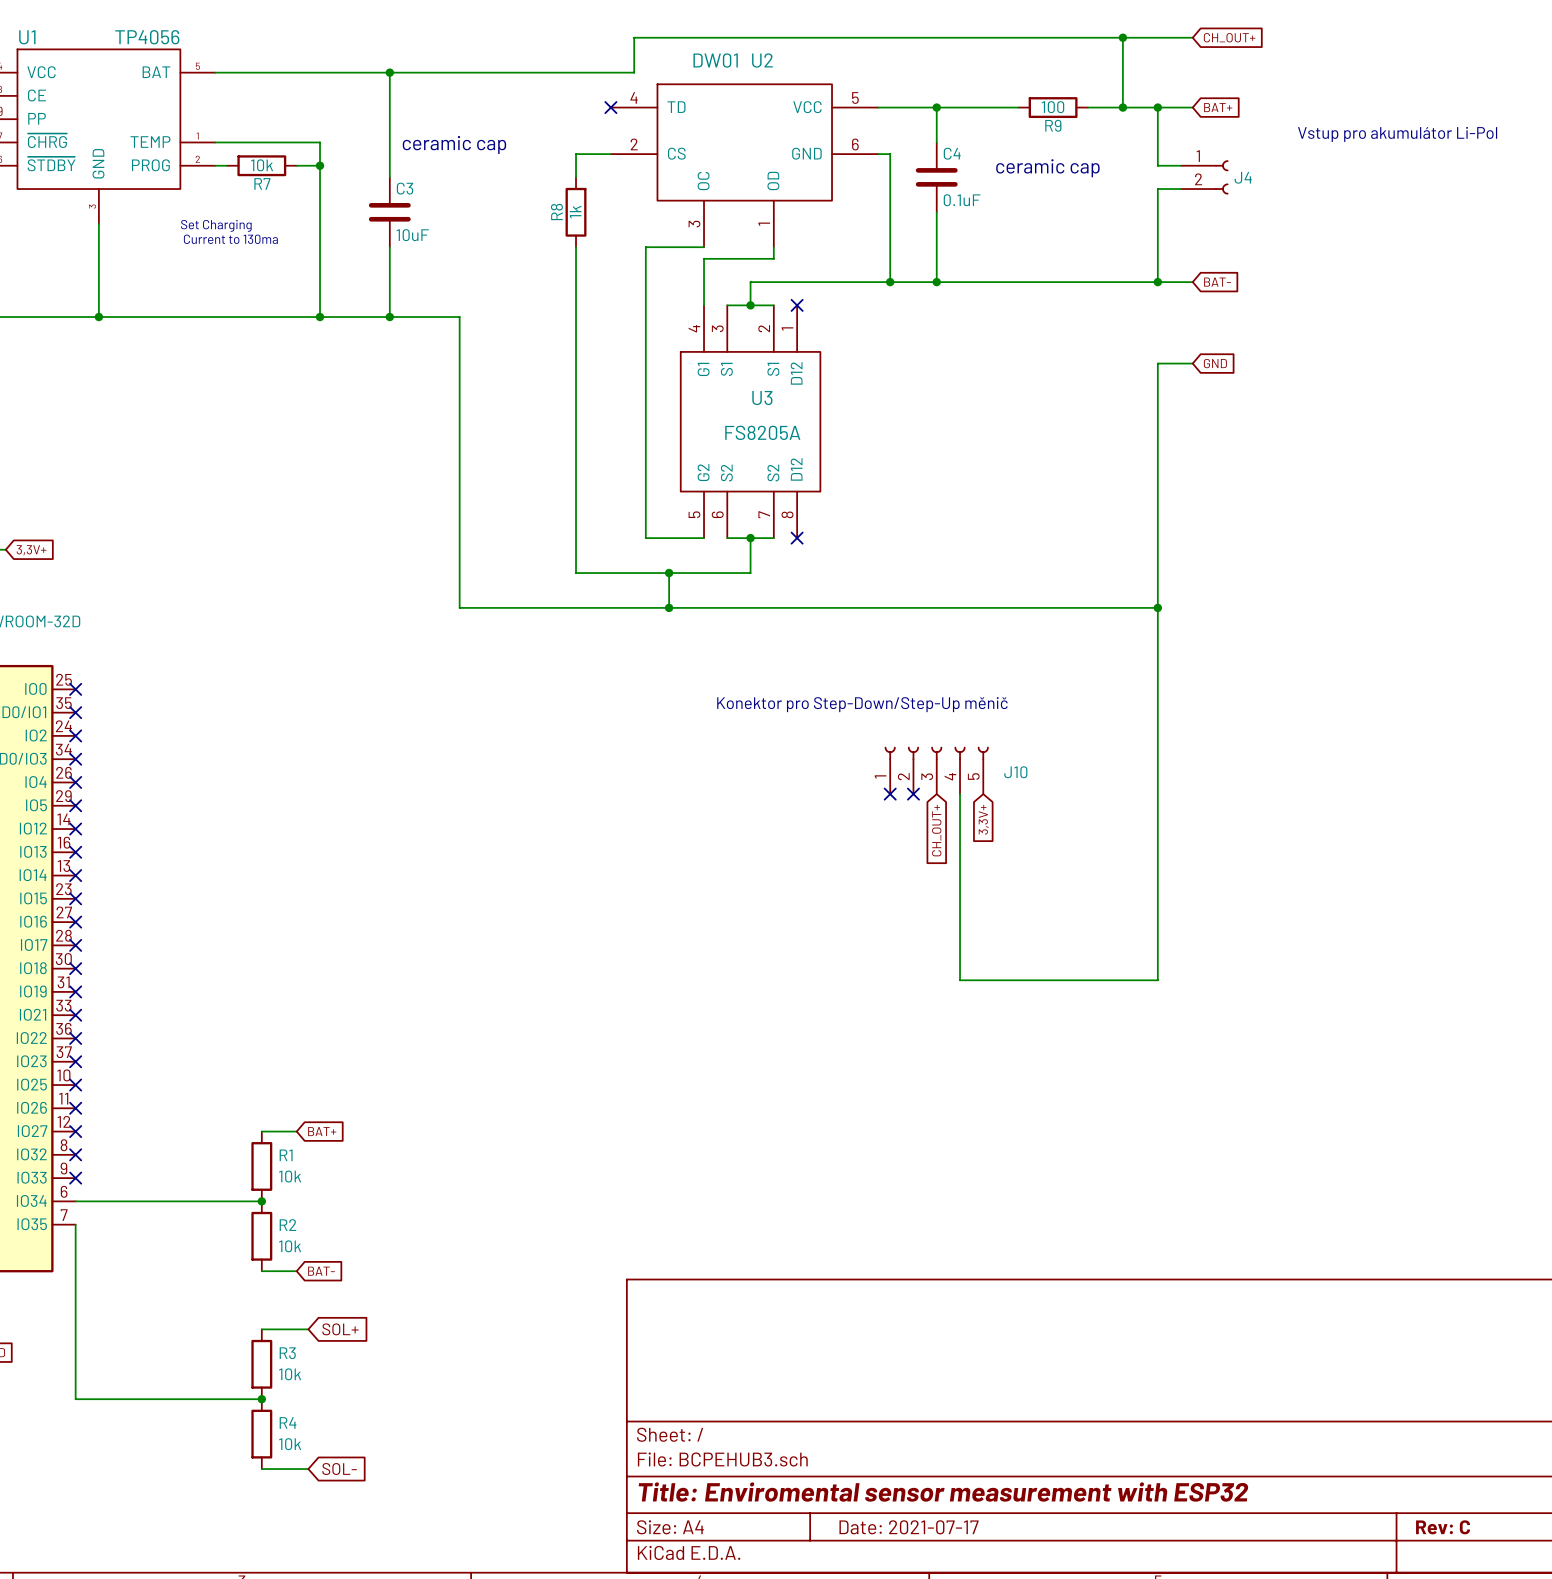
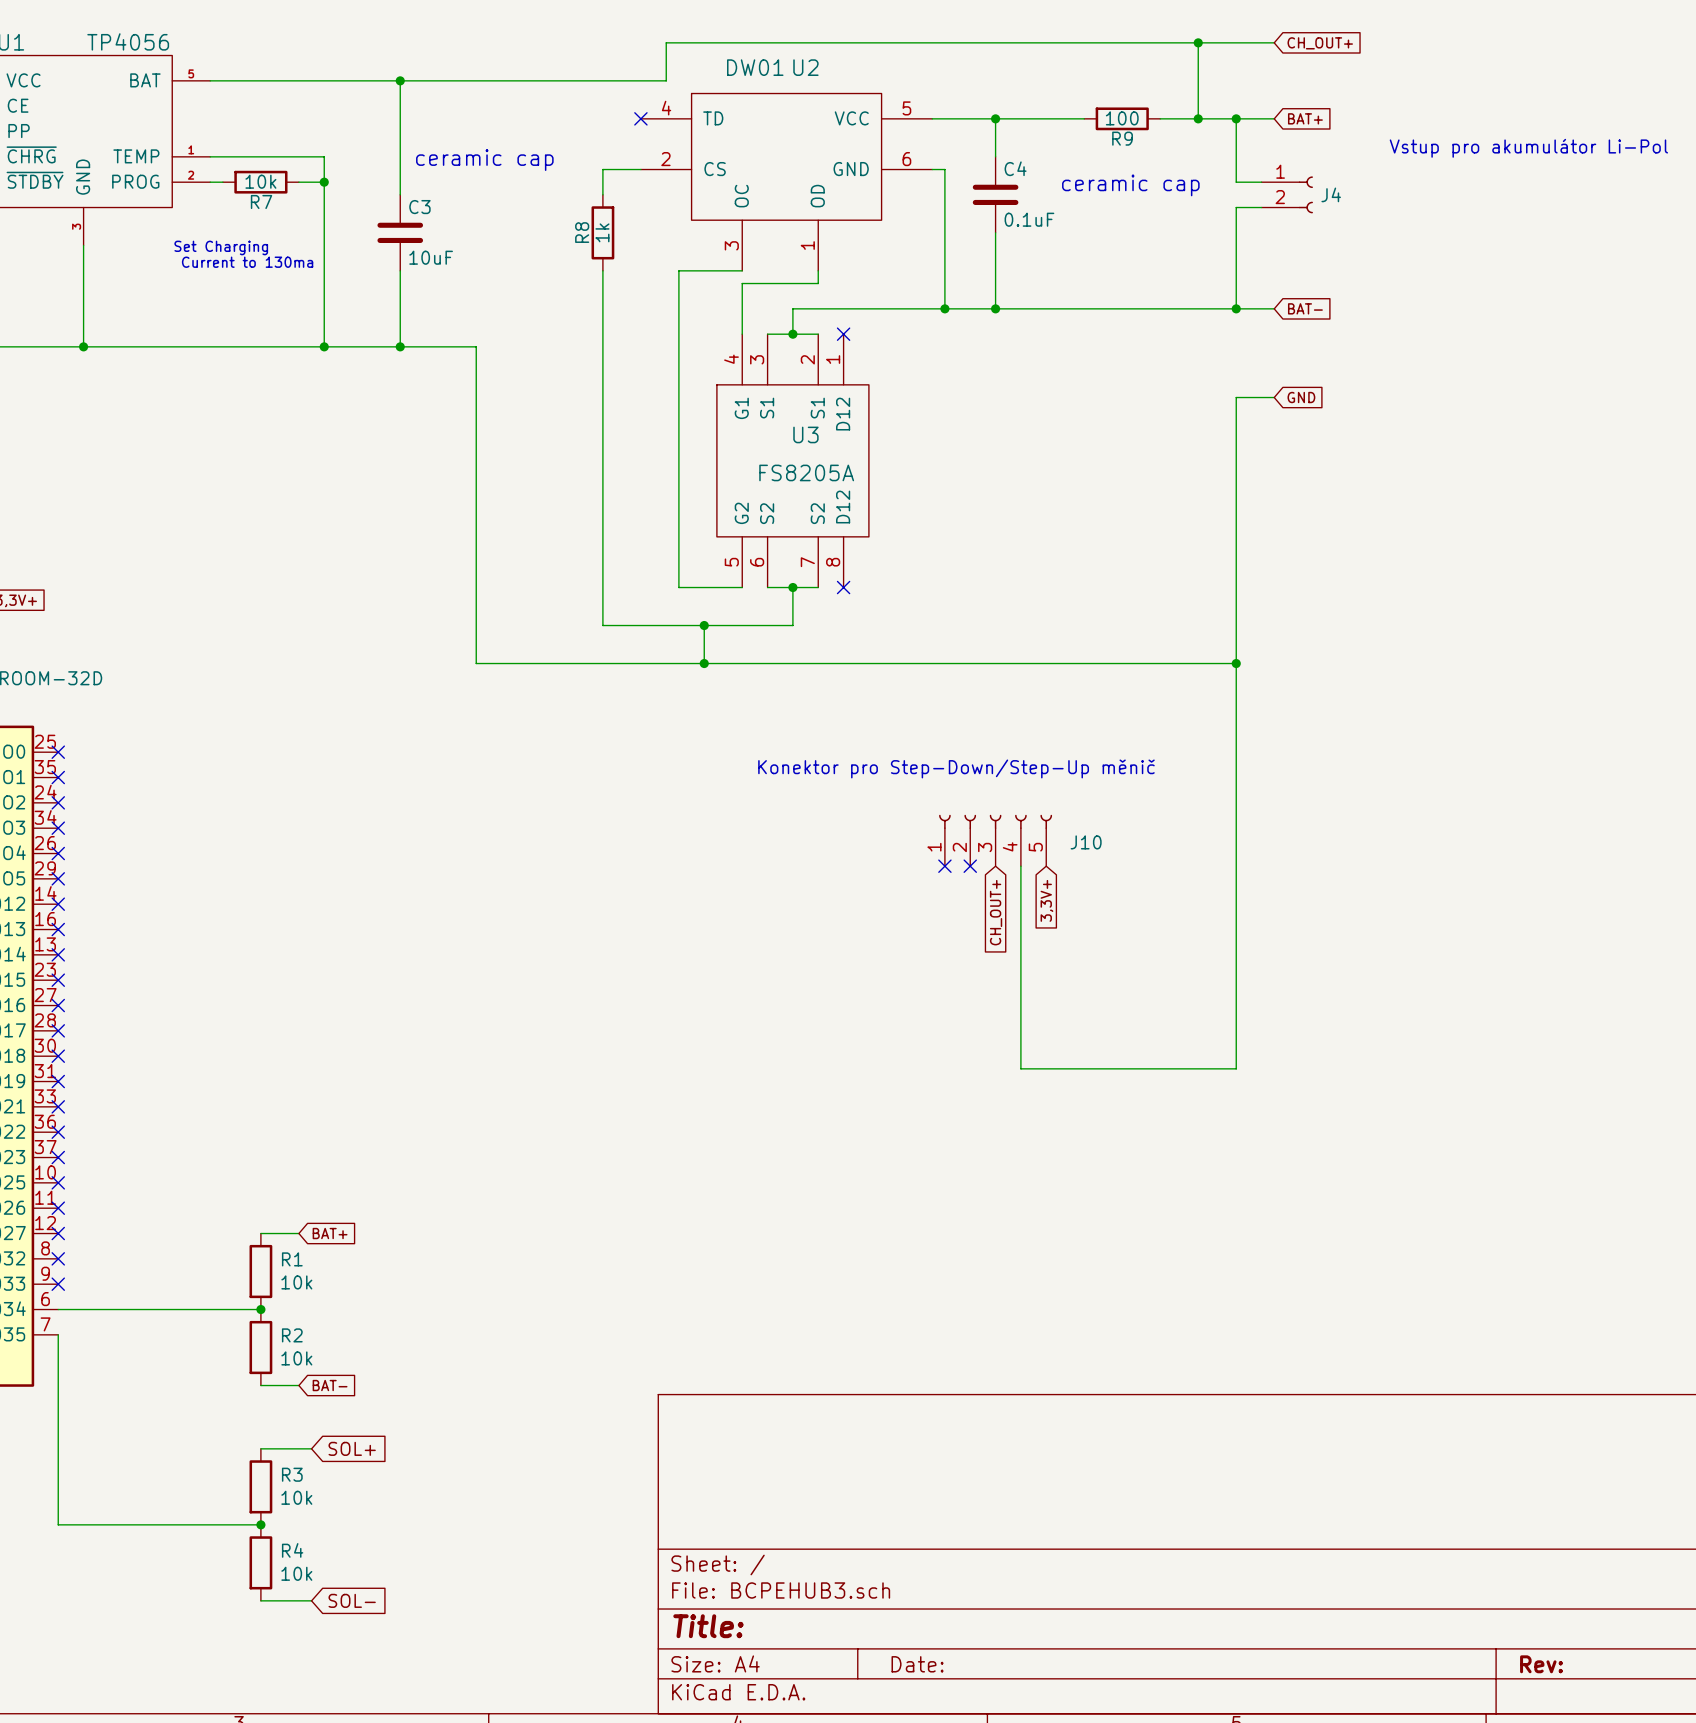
title block: Title: Enviromental sensor measurement with ESP32 (943, 1492) -> Title: (708, 1626)
title block: Date: 2021-07-17 (909, 1527) -> Date: (917, 1664)
title block: Rev: C (1443, 1527) -> Rev: (1541, 1664)

